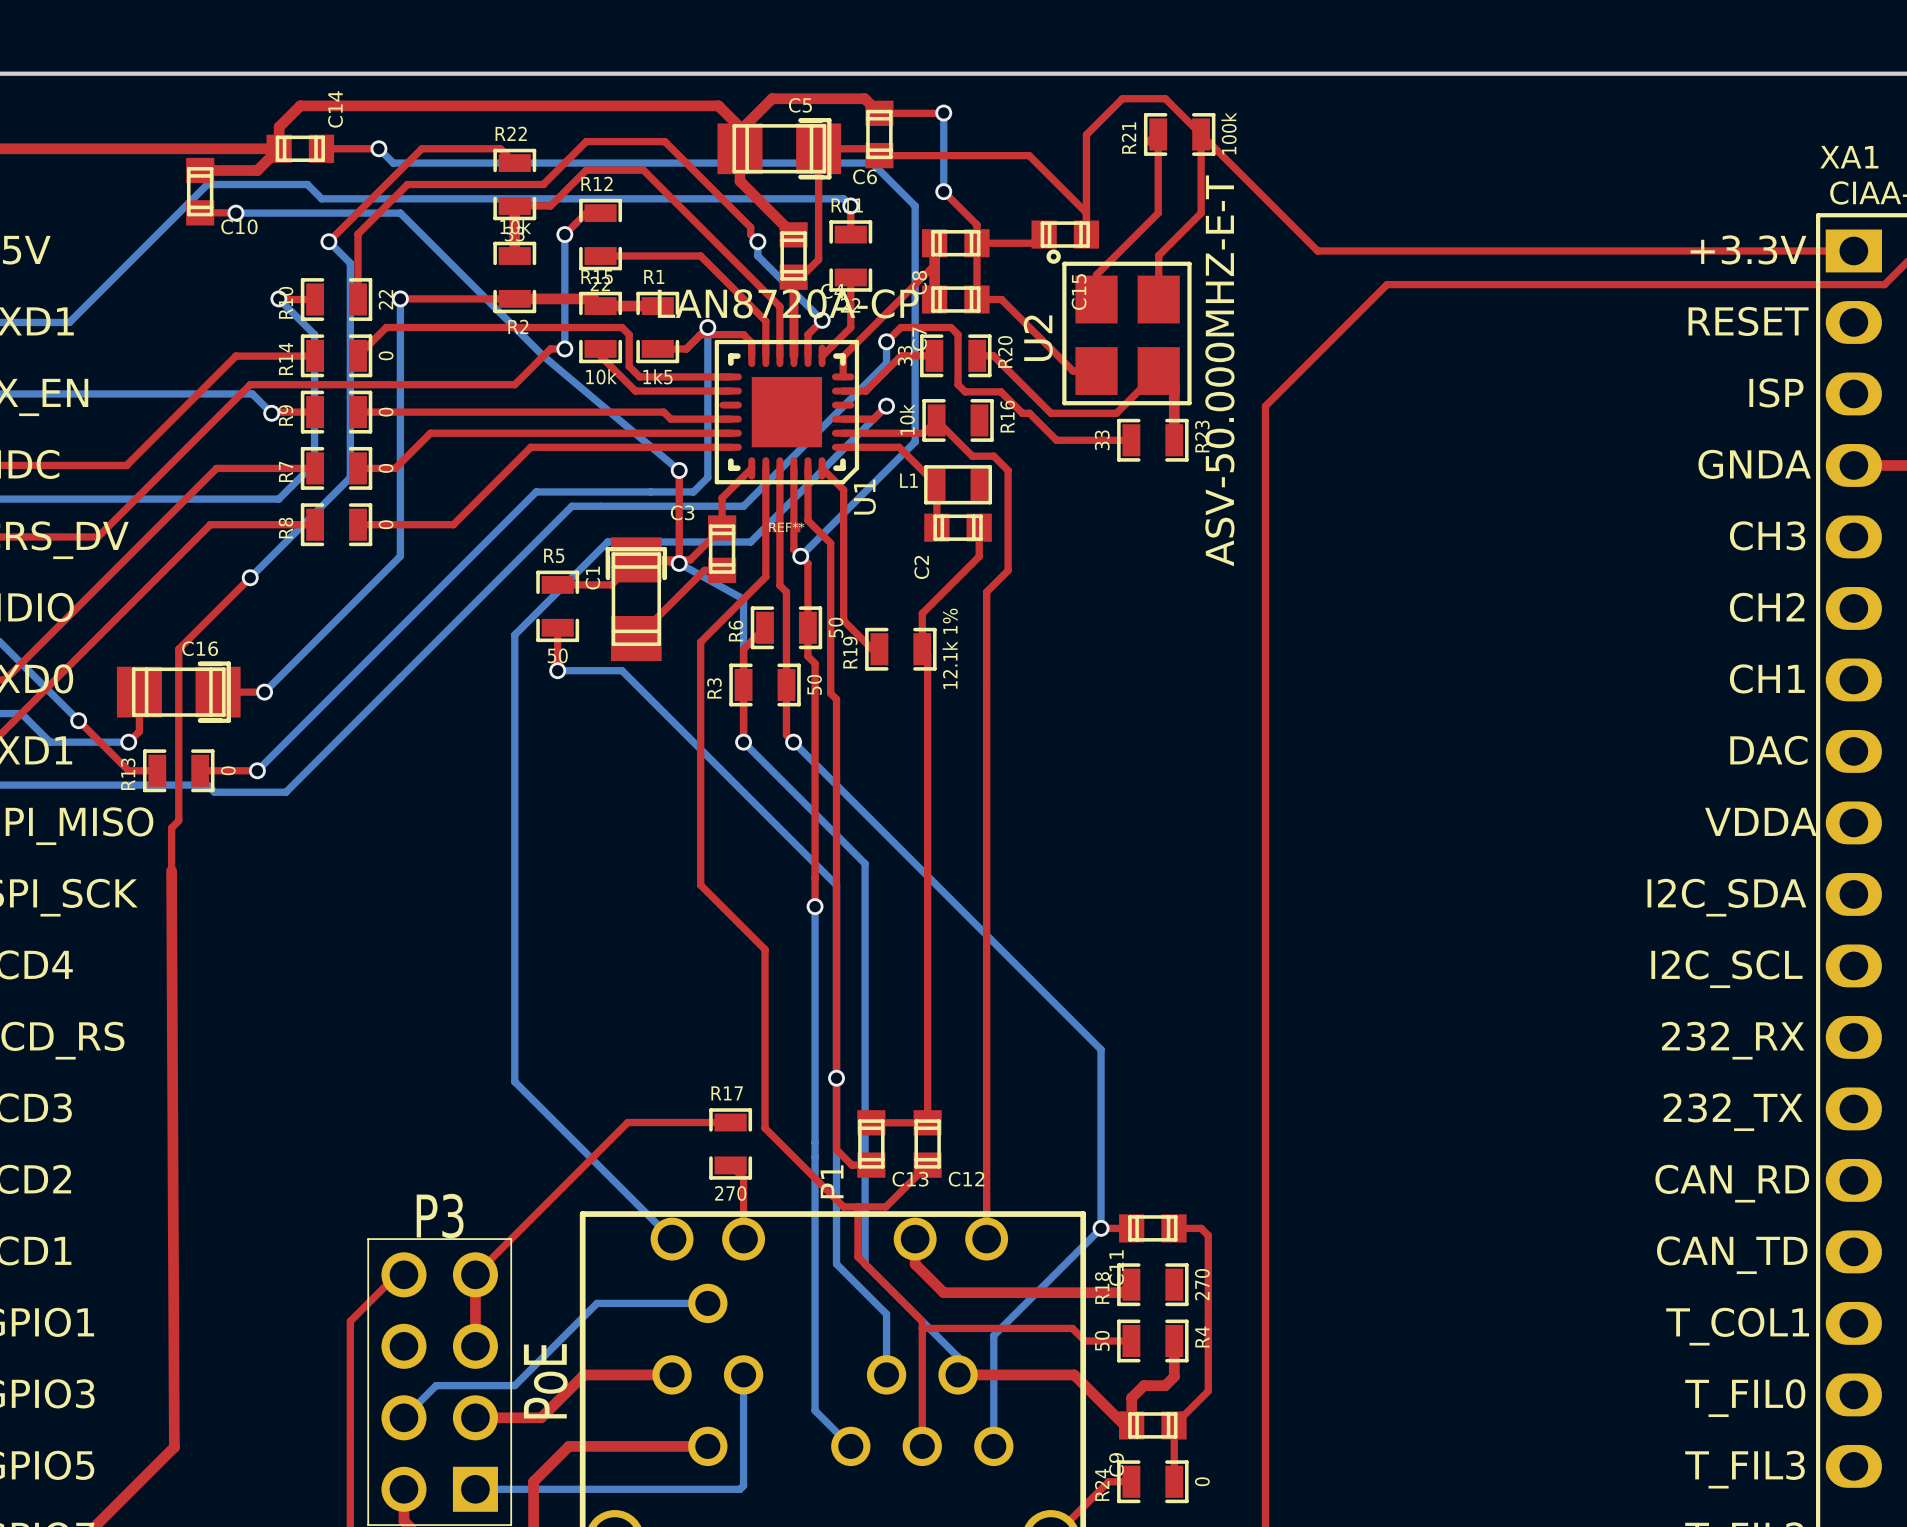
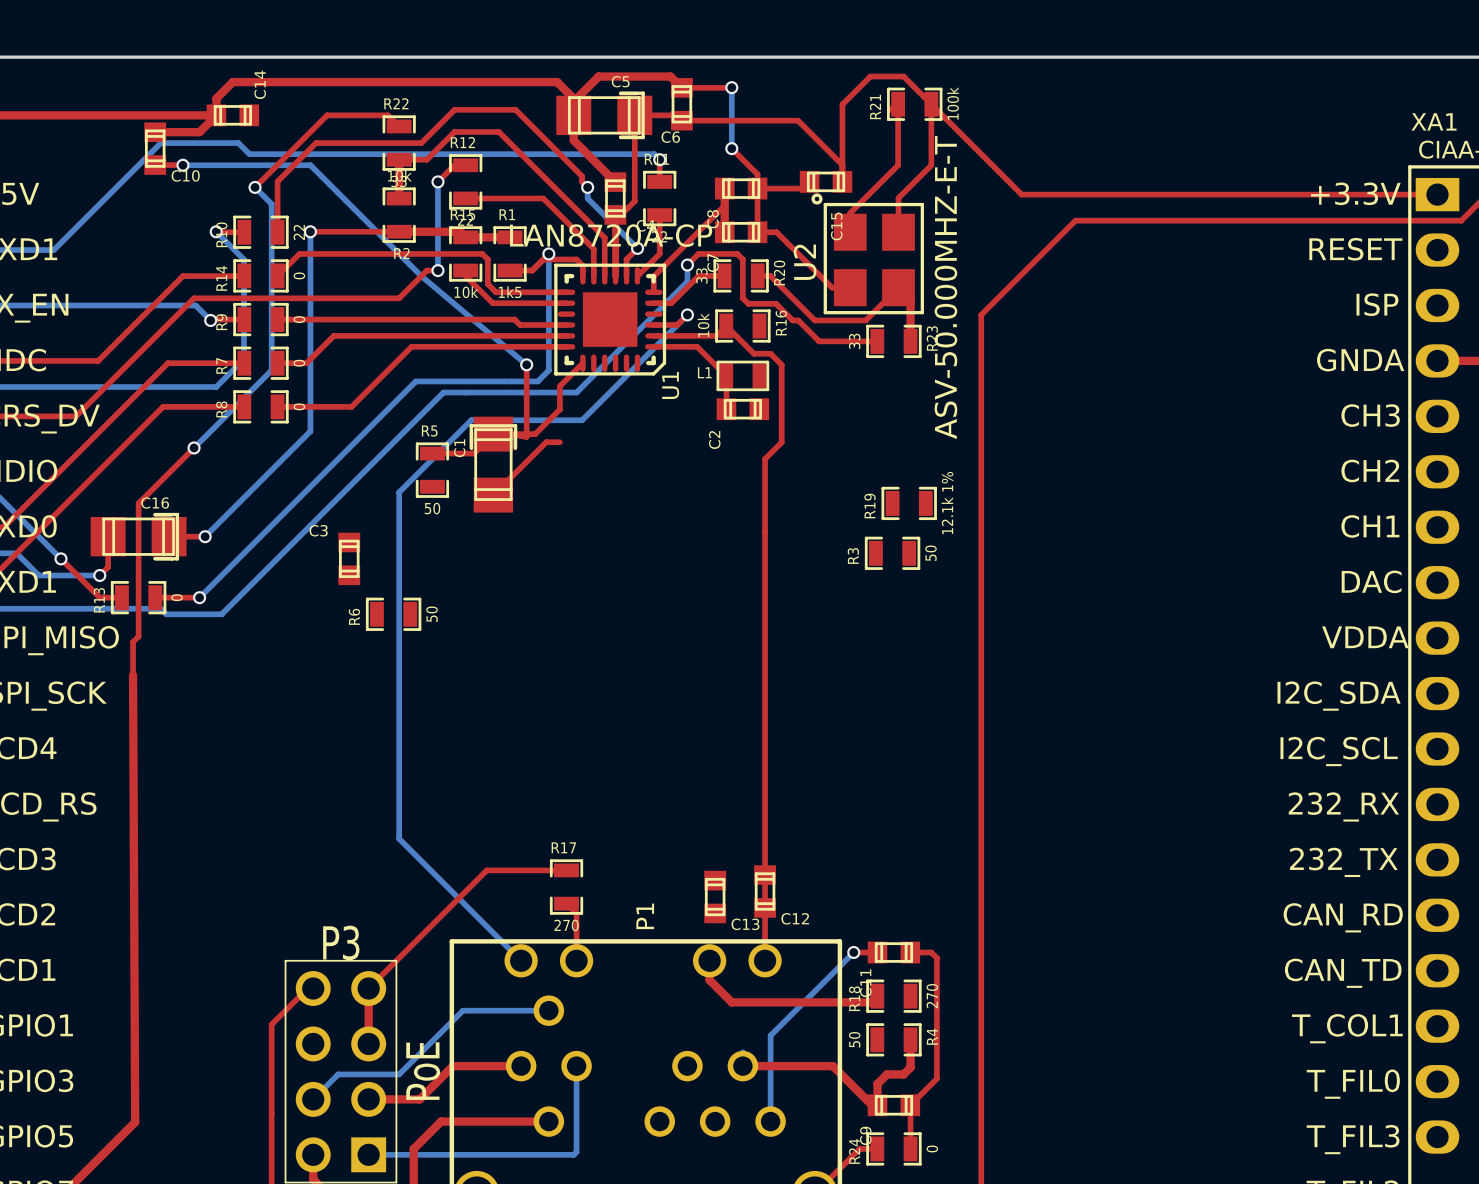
top track: (321, 148) (378, 148) -> none
bottom track: (378, 148) (393, 163) (872, 163) (915, 205) (915, 441) (800, 556) -> none
via: (378, 148) -> none
top track: (765, 468) (765, 576) (700, 642) (700, 885) (765, 949) (765, 1128) (843, 1206) (885, 1206) (927, 1165) -> none
top track: (779, 468) (779, 585) (786, 592) (786, 735) (793, 742) -> none
top track: (793, 468) (793, 549) (807, 563) (807, 656) (815, 663) (815, 906) -> none
top track: (808, 468) (808, 520) (830, 543) (830, 693) (836, 699) (836, 1149) (851, 1165) (871, 1165) -> none
top track: (822, 468) (843, 489) (843, 620) (872, 649) (879, 649) -> none
REF**: (786, 527) -> none
top track: (979, 527) (979, 556) (922, 613) (922, 649) (927, 654) (927, 1122) (871, 1122) -> none
C3 position: (722, 549) -> (349, 558)
via: (800, 556) -> none
bottom track: (679, 563) (743, 599) (743, 742) (865, 863) (865, 1264) (958, 1357) -> none
via: (679, 563) -> none
top track: (557, 627) (557, 670) -> none
top track: (765, 627) (743, 649) (743, 742) -> none
R6 position: (786, 627) -> (393, 614)
R19 position: (900, 649) -> (909, 503)
bottom track: (557, 670) (622, 670) (836, 885) (836, 1264) (886, 1314) (886, 1374) -> none
via: (557, 670) -> none
R3 position: (765, 684) -> (892, 553)
via: (743, 742) -> none
bottom track: (793, 742) (1101, 1049) (1101, 1228) -> none
via: (793, 742) -> none
bottom track: (815, 906) (815, 1410) (850, 1446) -> none
via: (815, 906) -> none
via: (836, 1078) -> none
C13 position: (871, 1143) -> (715, 897)
C12 position: (927, 1143) -> (765, 891)
top track: (857, 1206) (857, 1256) (922, 1321) (922, 1446) -> none
top track: (922, 1328) (1072, 1328) (1085, 1340) (1131, 1340) -> none

